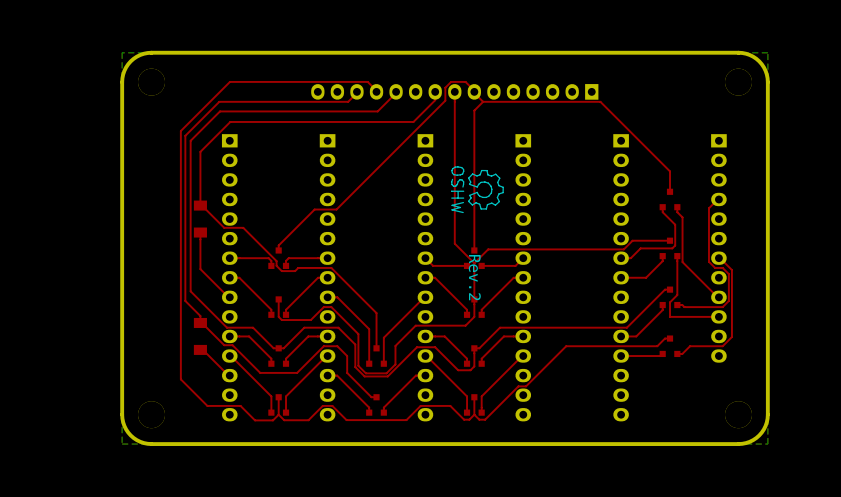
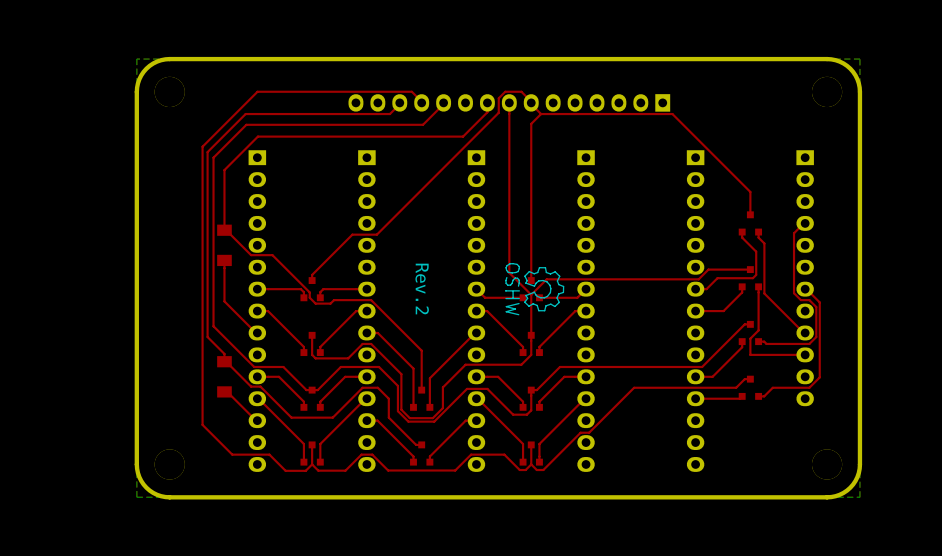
drawing position: (477, 189) -> (534, 289)
text position: Rev.2 (474, 277) -> Rev.2 (422, 289)

